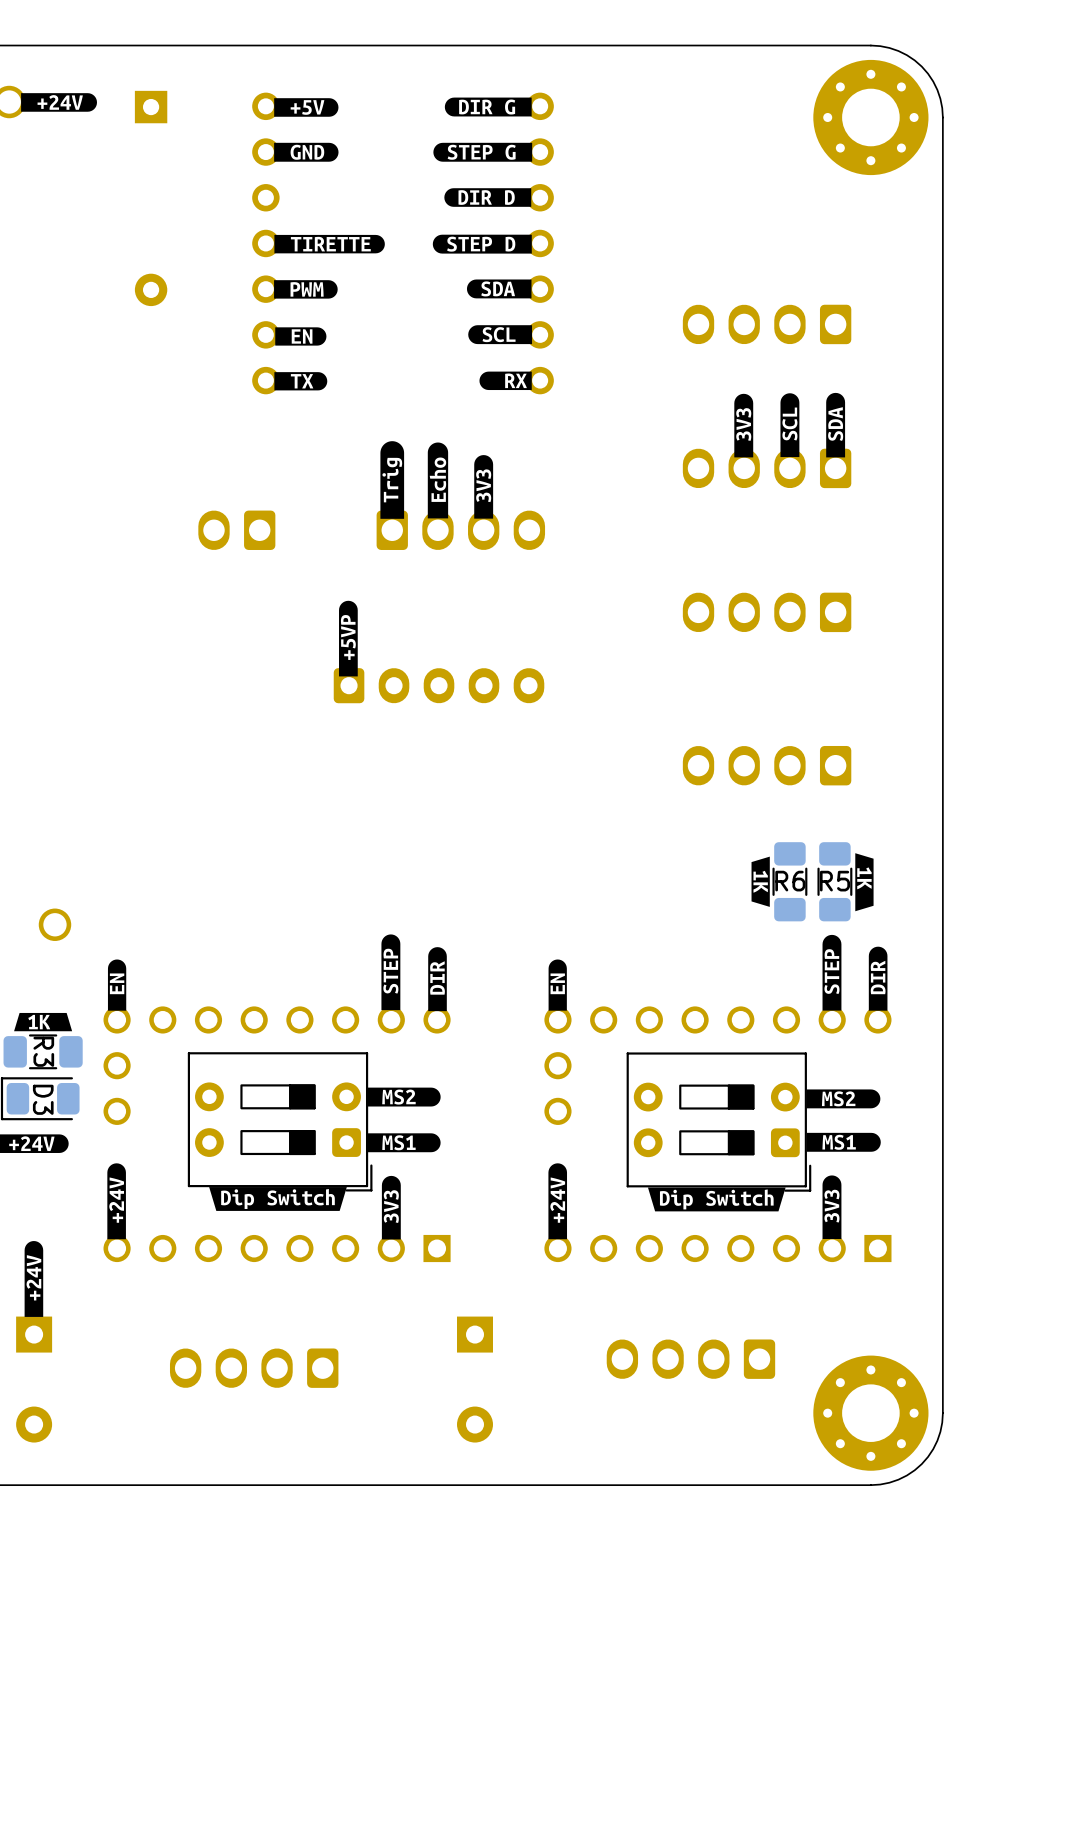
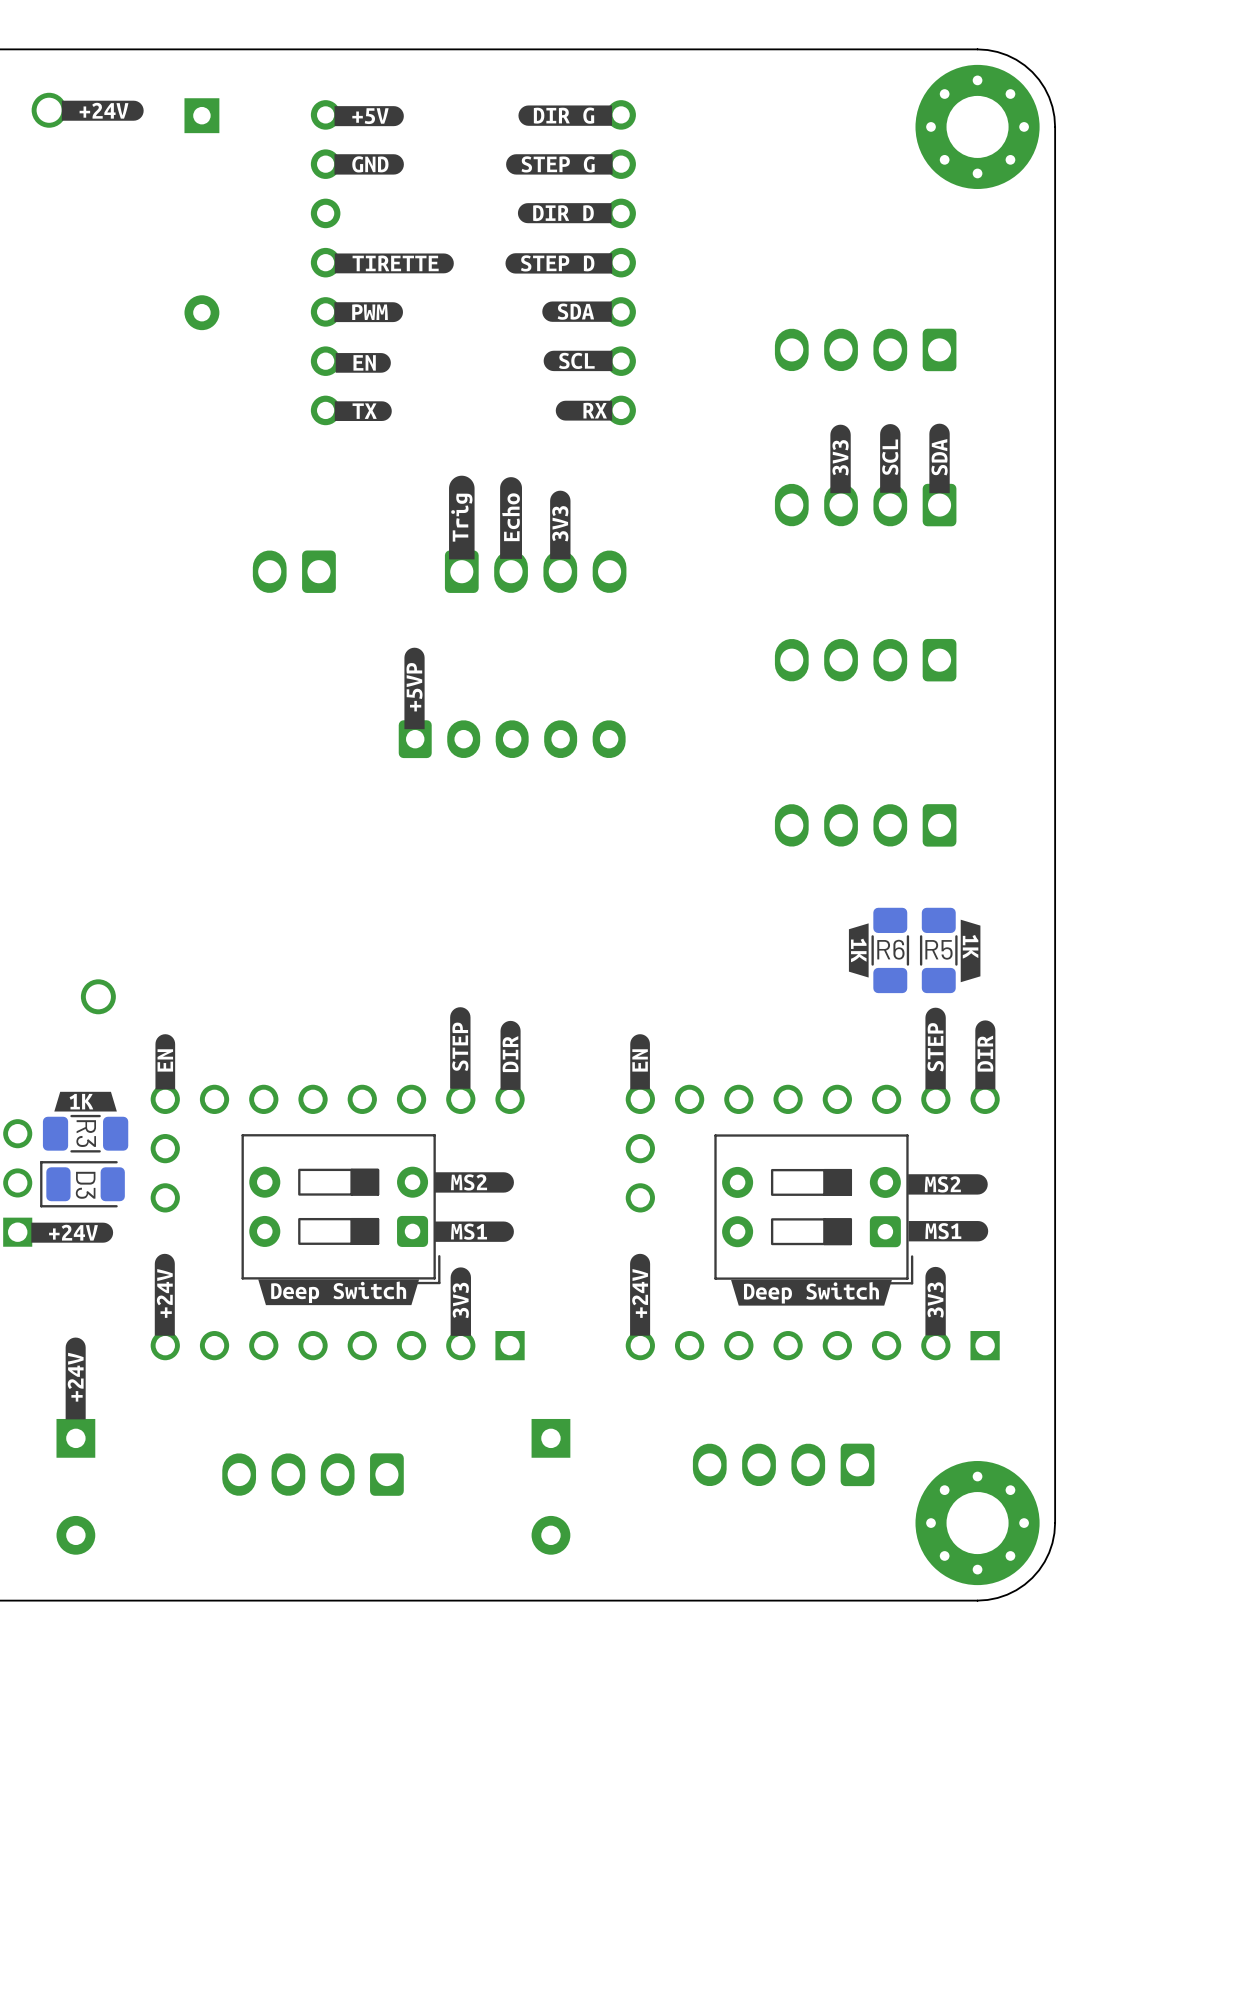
drawing shape: [209, 1187, 347, 1211] -> [258, 1279, 420, 1306]
drawing shape: [647, 1187, 786, 1212] -> [731, 1279, 892, 1306]

